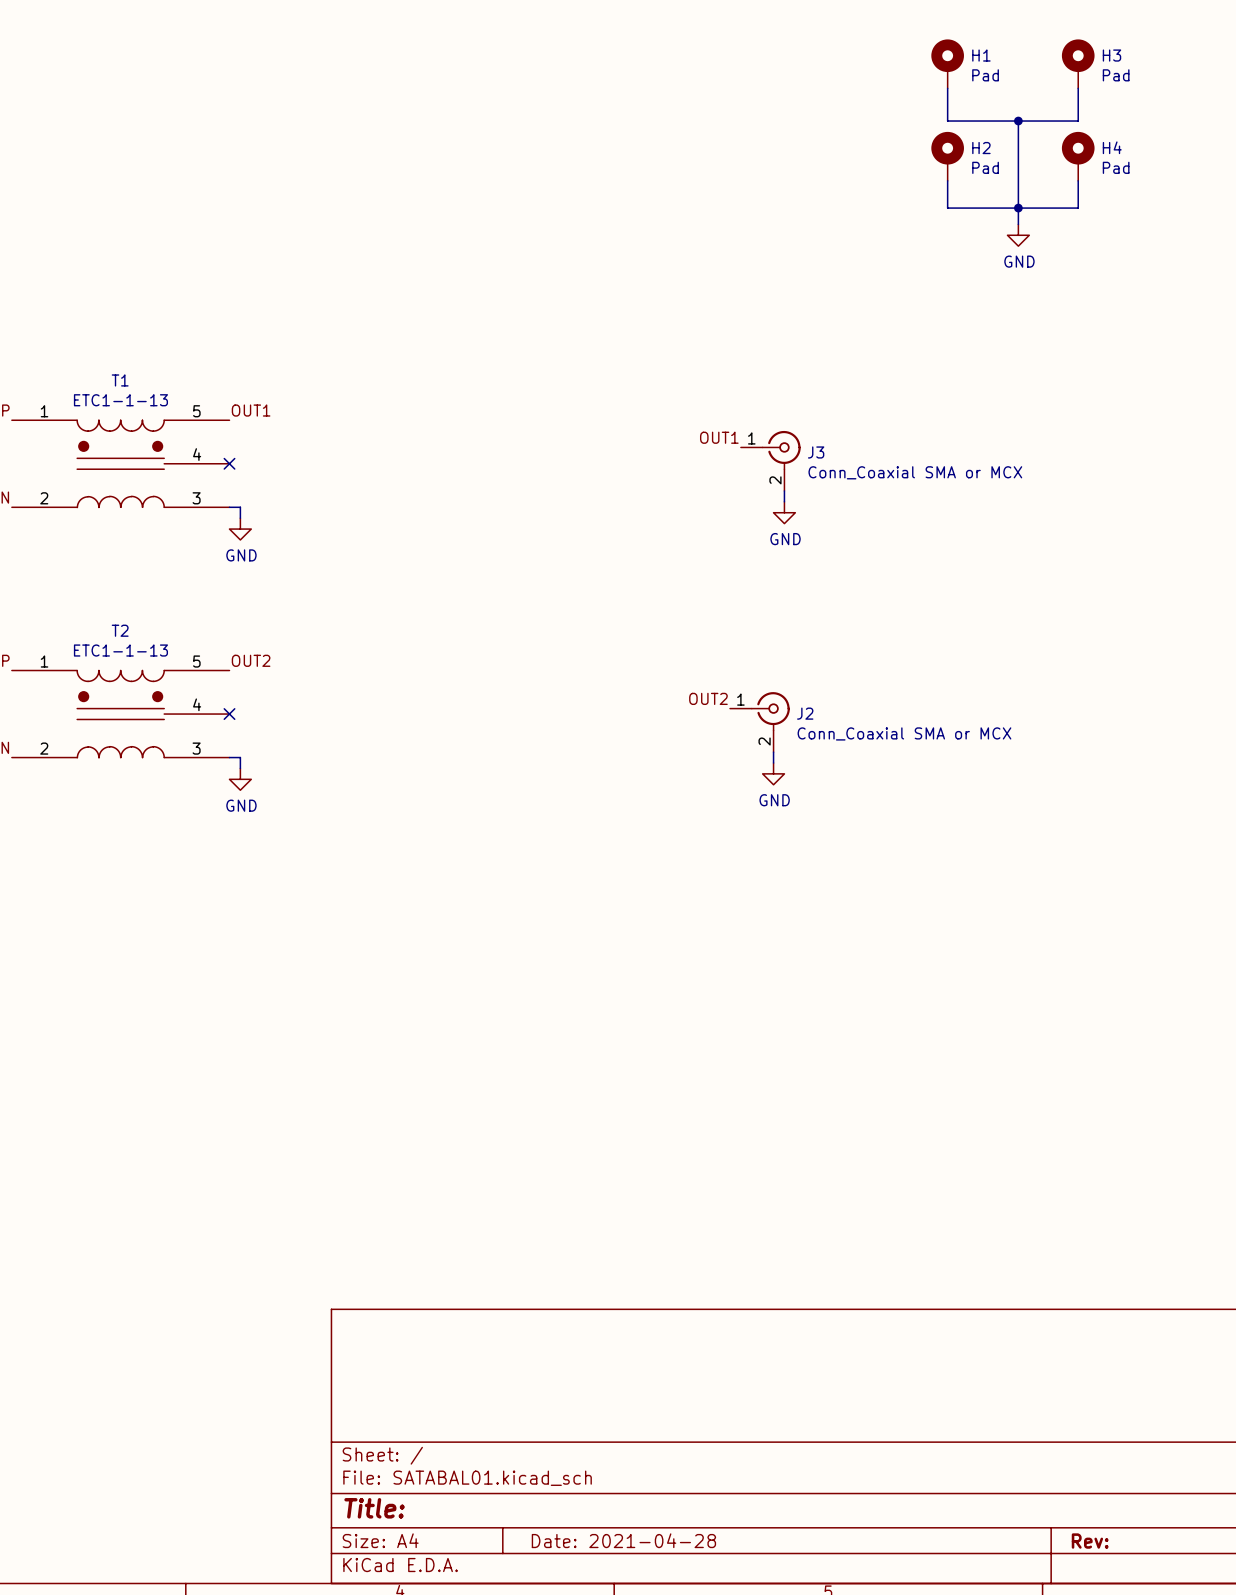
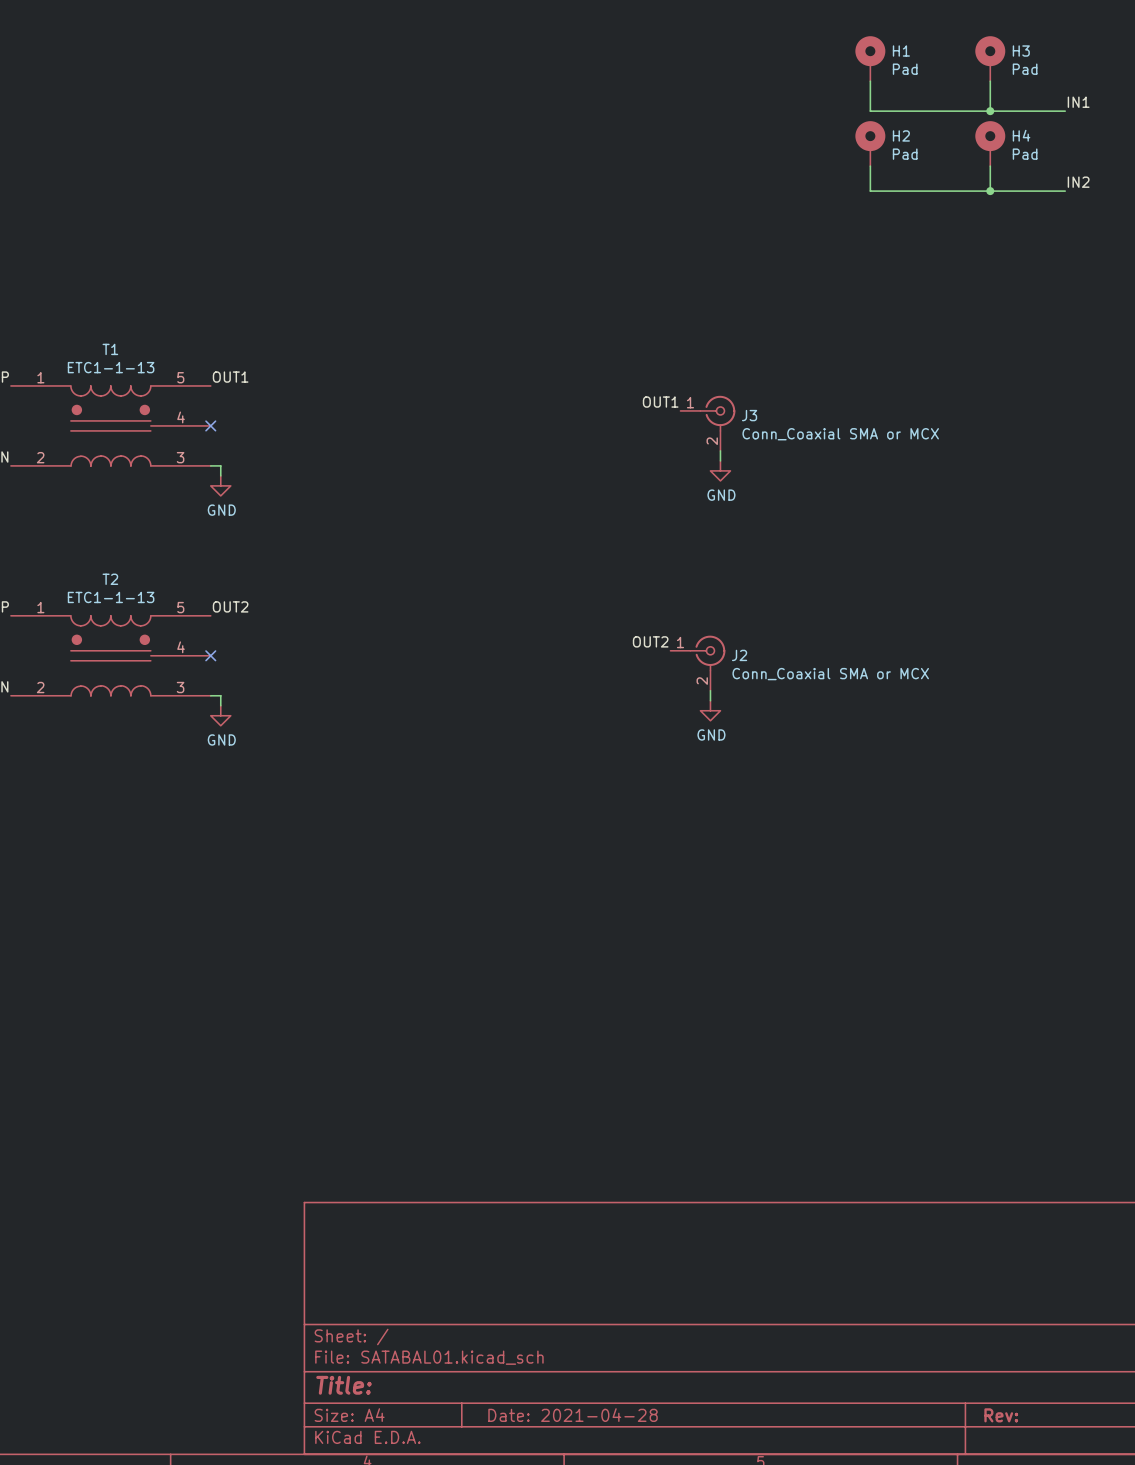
label: none -> IN1 (1078, 102)
wire: (1018, 121) (1018, 224) -> none
junction: (1018, 121) -> none
wire: none -> (990, 111) (1065, 111)
junction: none -> (990, 111)
label: none -> IN2 (1078, 182)
junction: (1018, 208) -> none
wire: none -> (990, 191) (1065, 191)
junction: none -> (990, 191)
power symbol: GND (1018, 235) -> none

